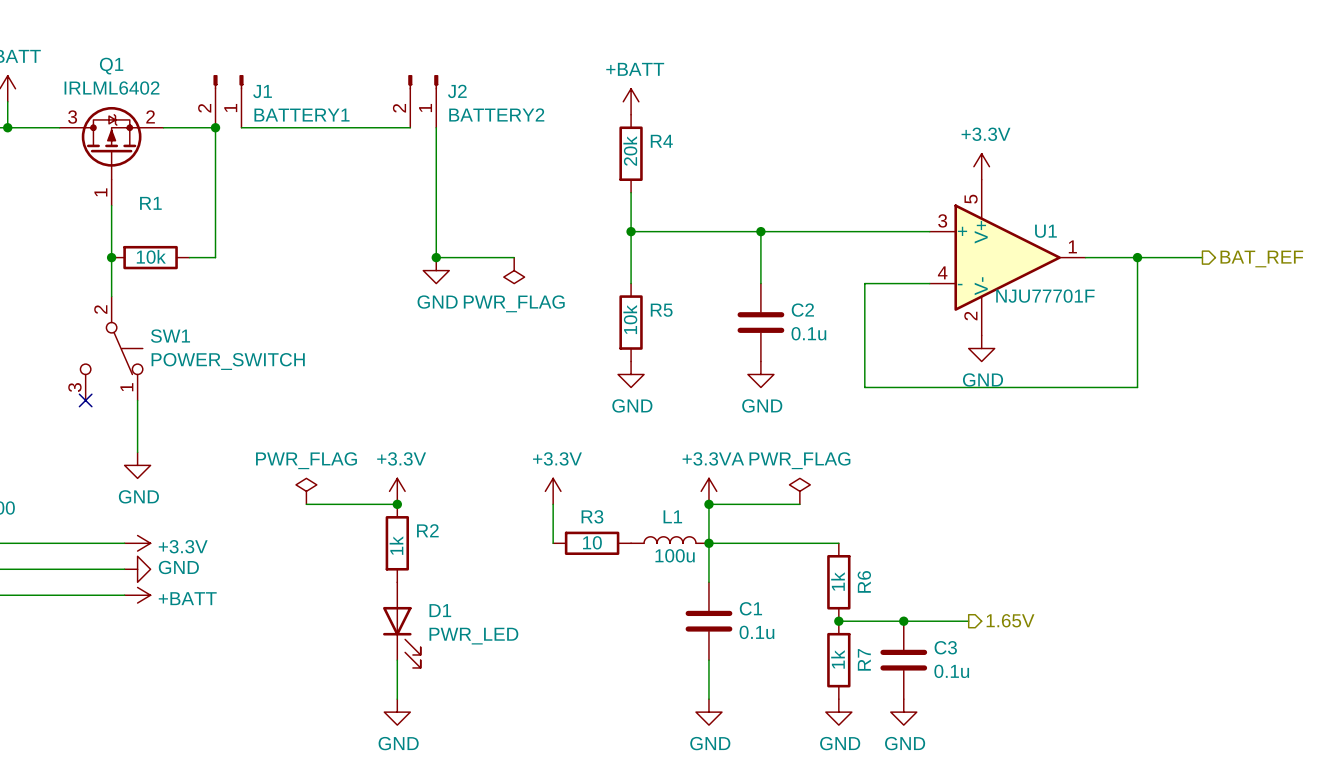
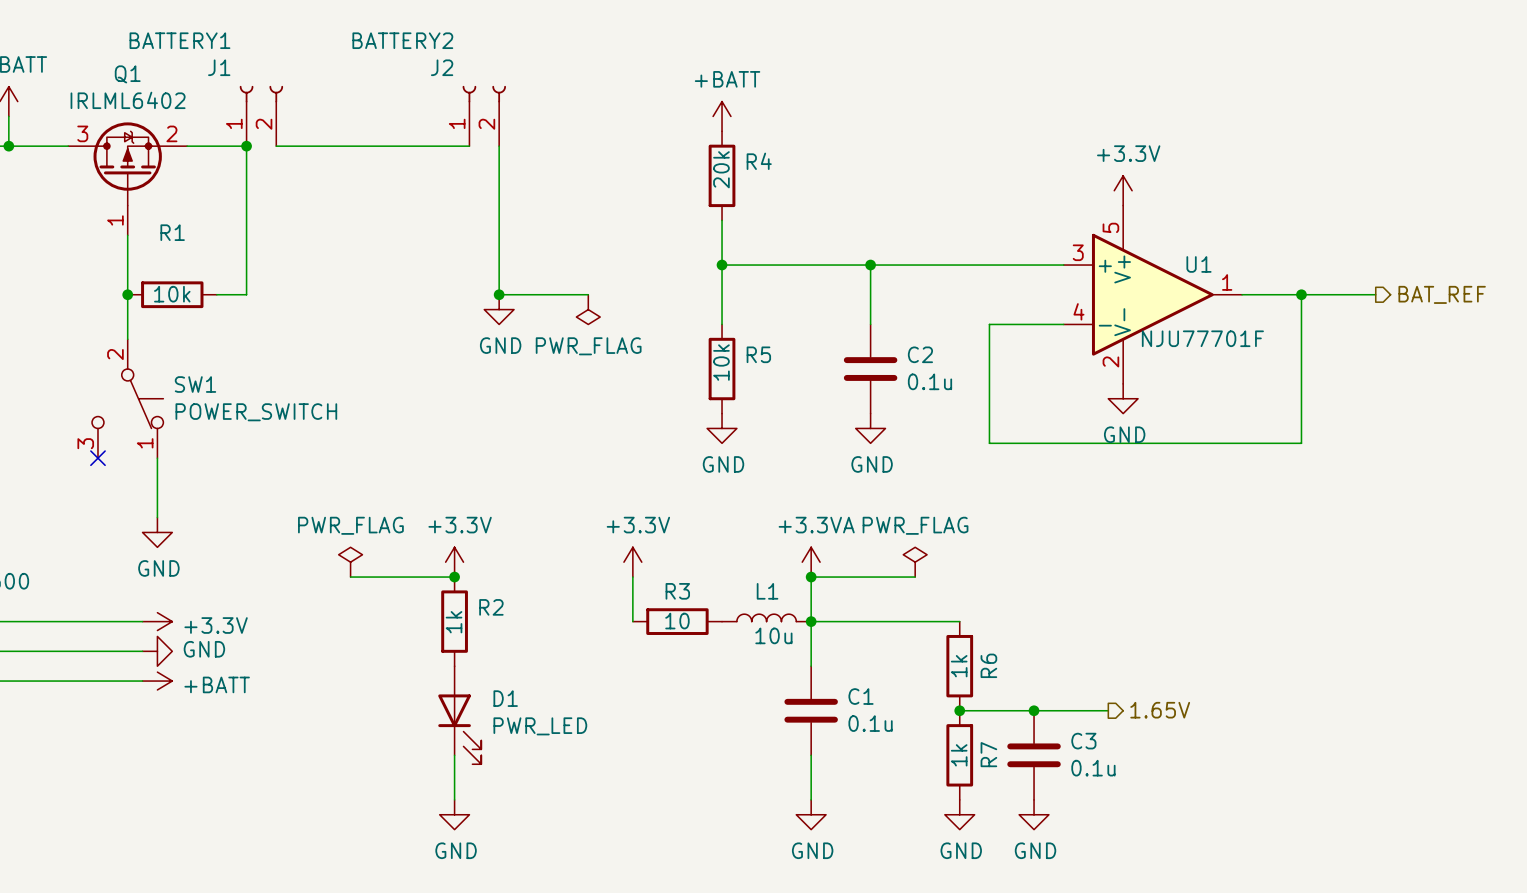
J1 symbol: [213, 75, 244, 128] -> [239, 85, 284, 147]
J2 symbol: [408, 75, 439, 128] -> [462, 85, 506, 147]
J1 name position: J1 (262, 91) -> J1 (219, 67)
J2 name position: J2 (457, 91) -> J2 (442, 67)
J2 value position: BATTERY2 (496, 114) -> BATTERY2 (402, 40)
J1 value position: BATTERY1 (301, 115) -> BATTERY1 (179, 40)
L1 value: 100u (675, 555) -> 10u (773, 635)

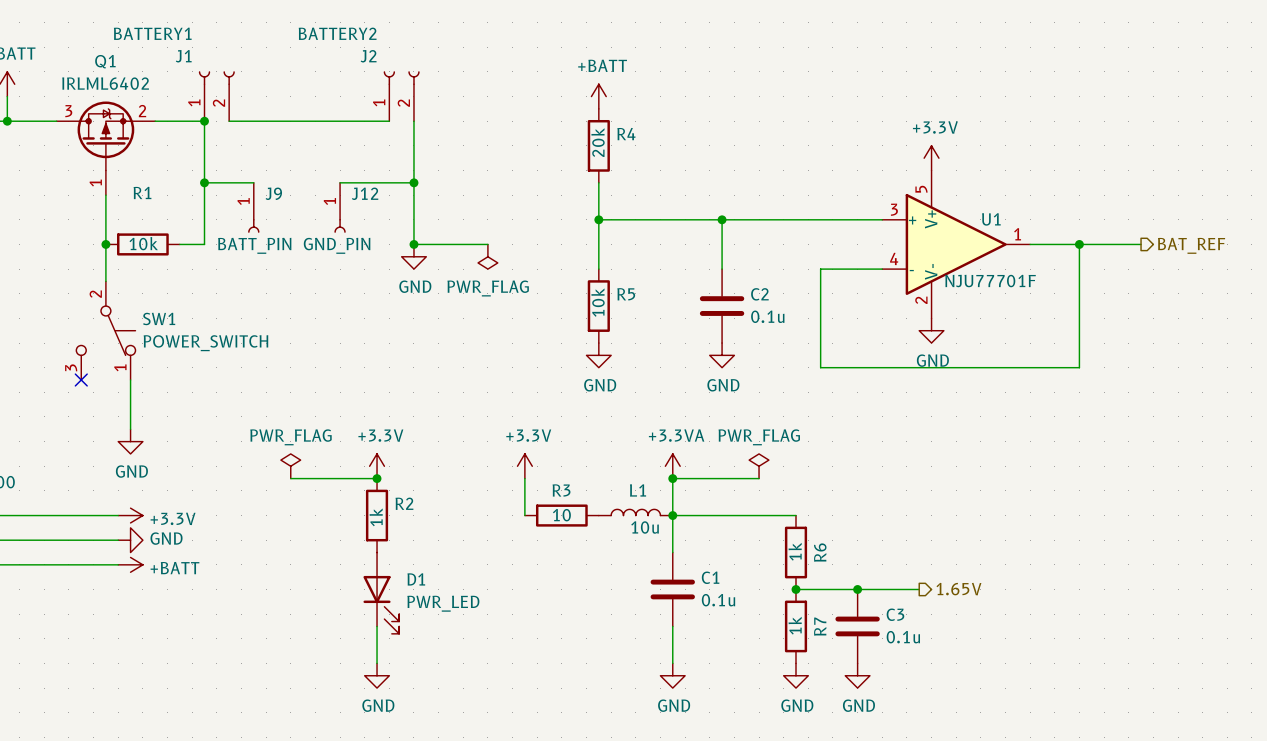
wire: none -> (204, 182) (253, 182)
junction: none -> (204, 182)
wire: none -> (340, 182) (413, 182)
junction: none -> (413, 182)
J9: none -> BATT_PIN (253, 207)
J12: none -> GND_PIN (340, 207)

